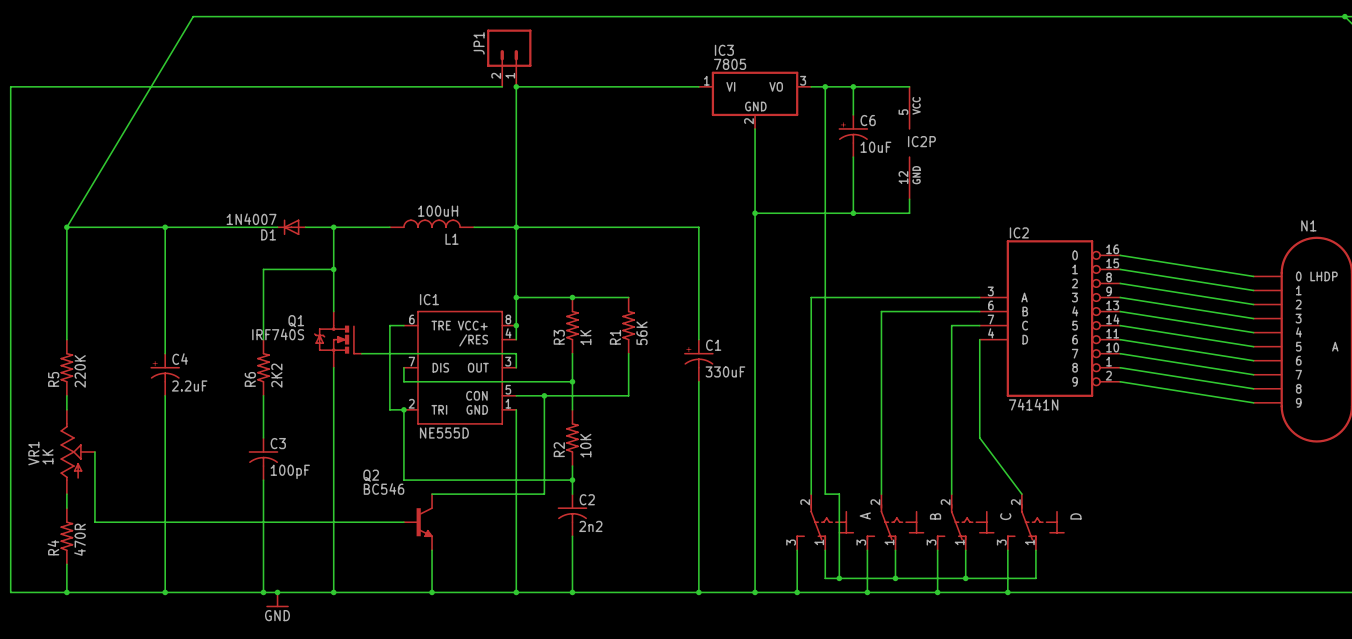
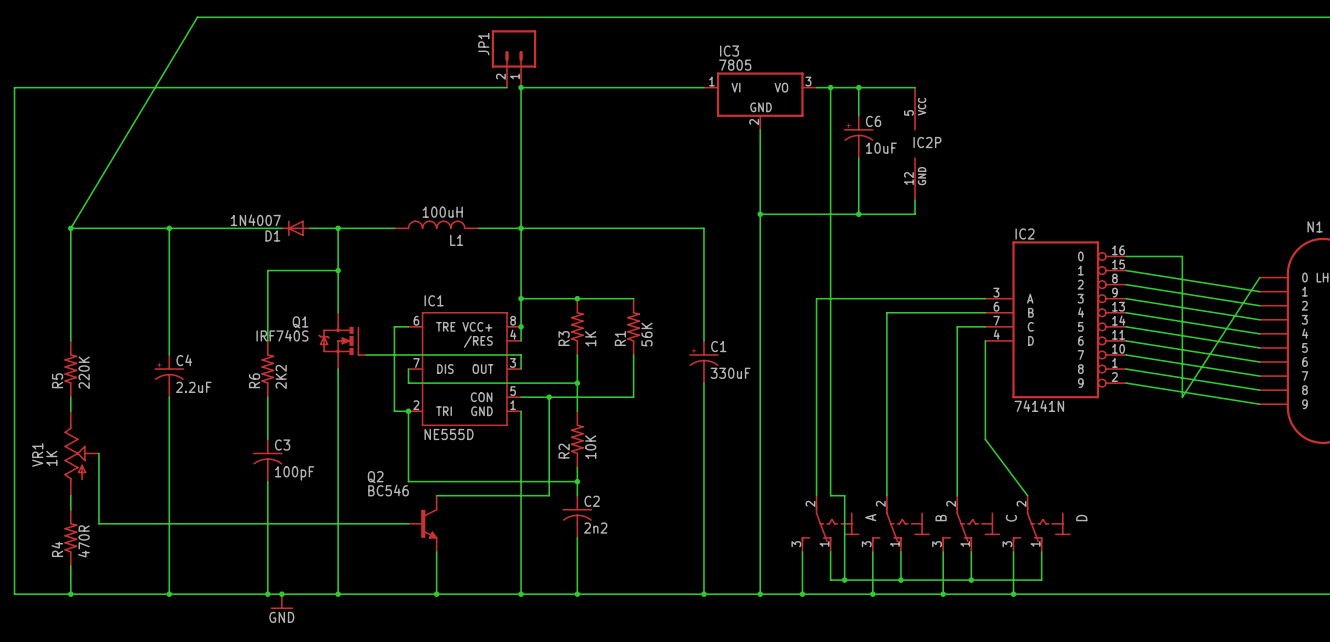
wire: (1120, 255) (1253, 276) -> (1126, 256) (1182, 256) (1182, 397) (1259, 277)

